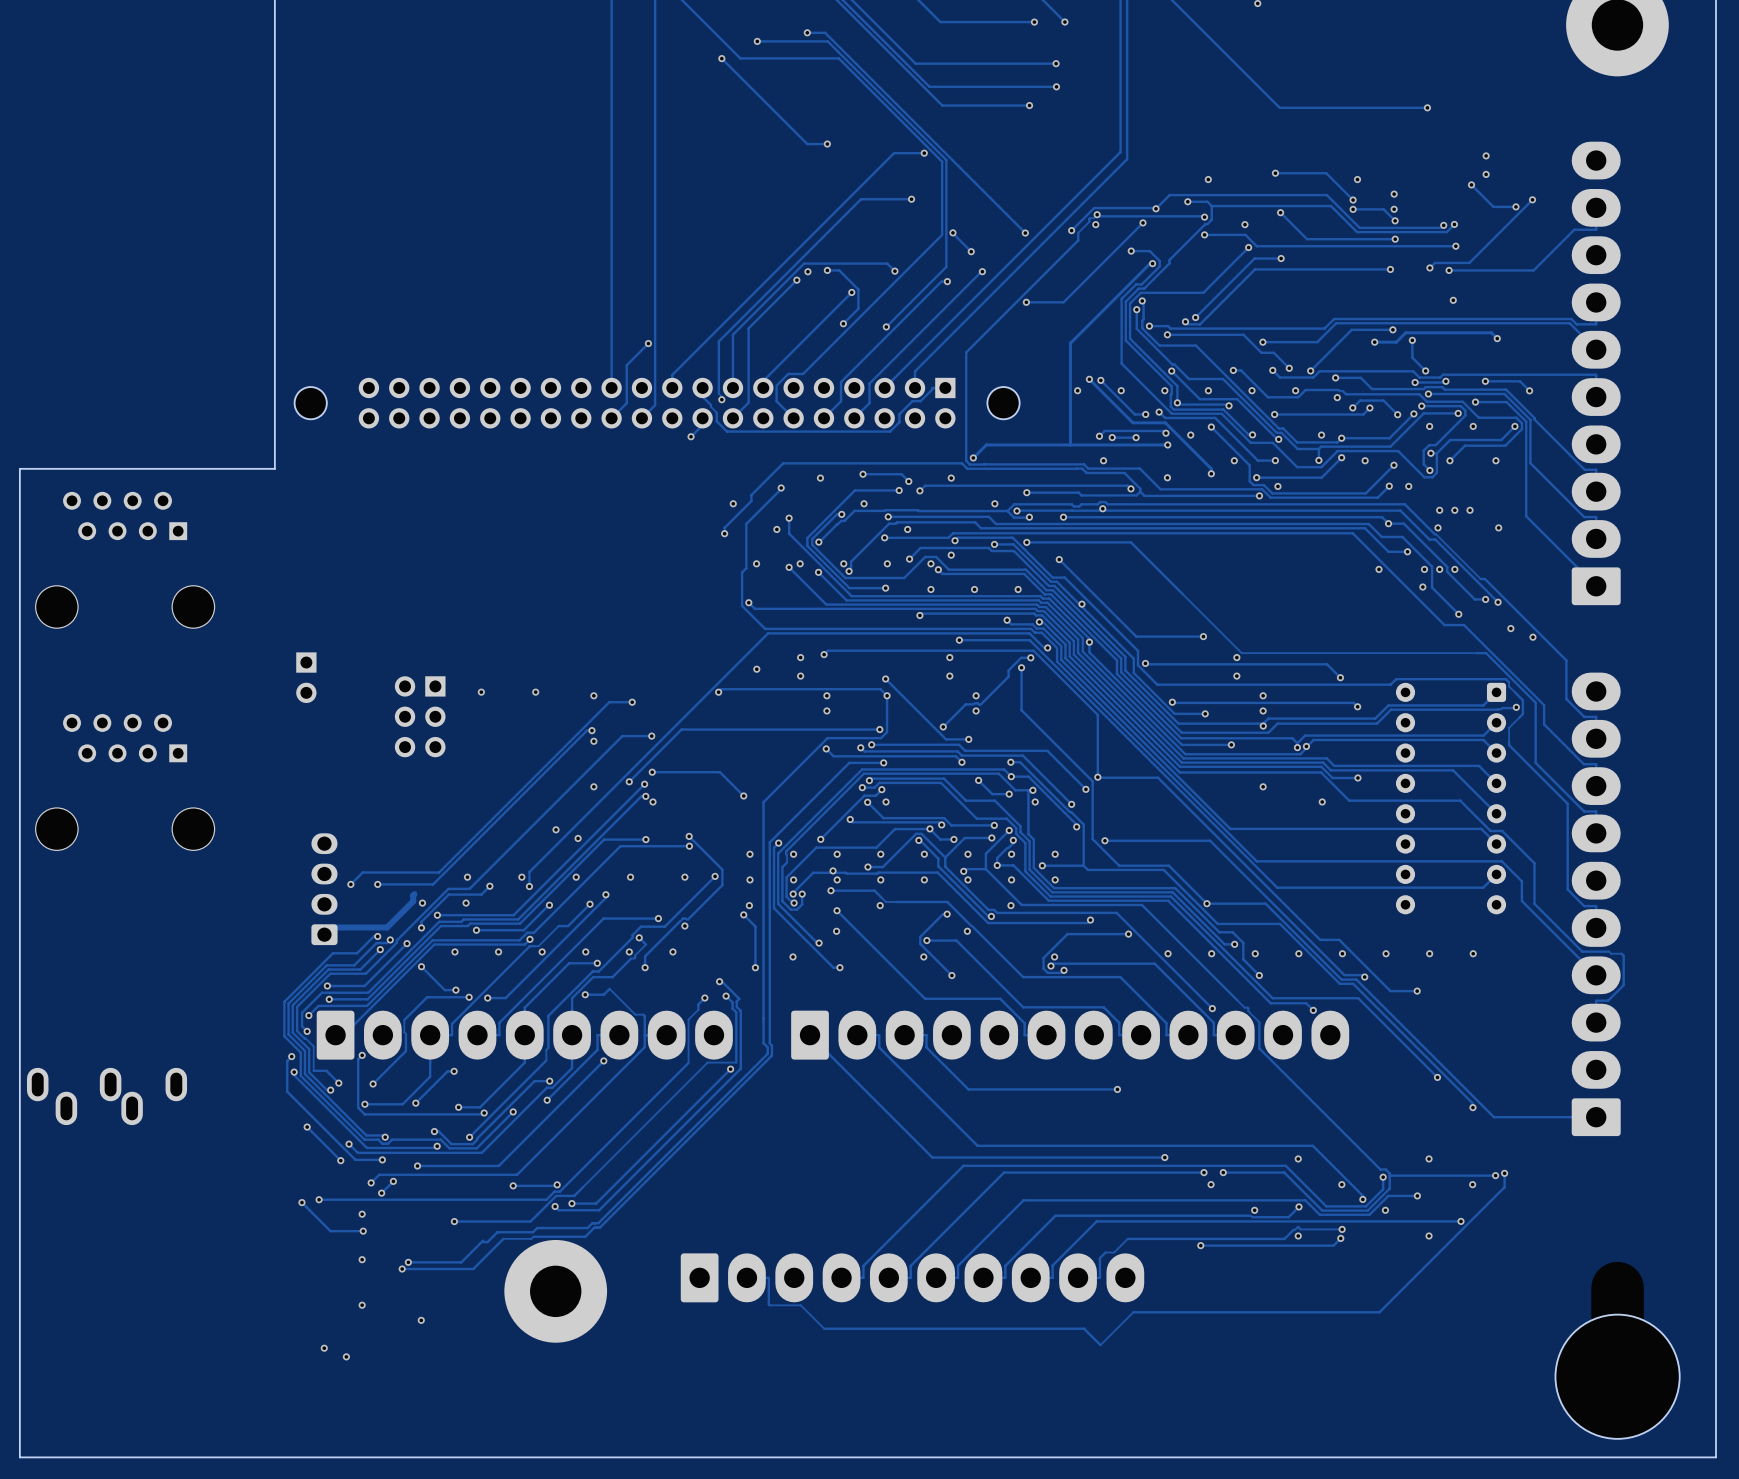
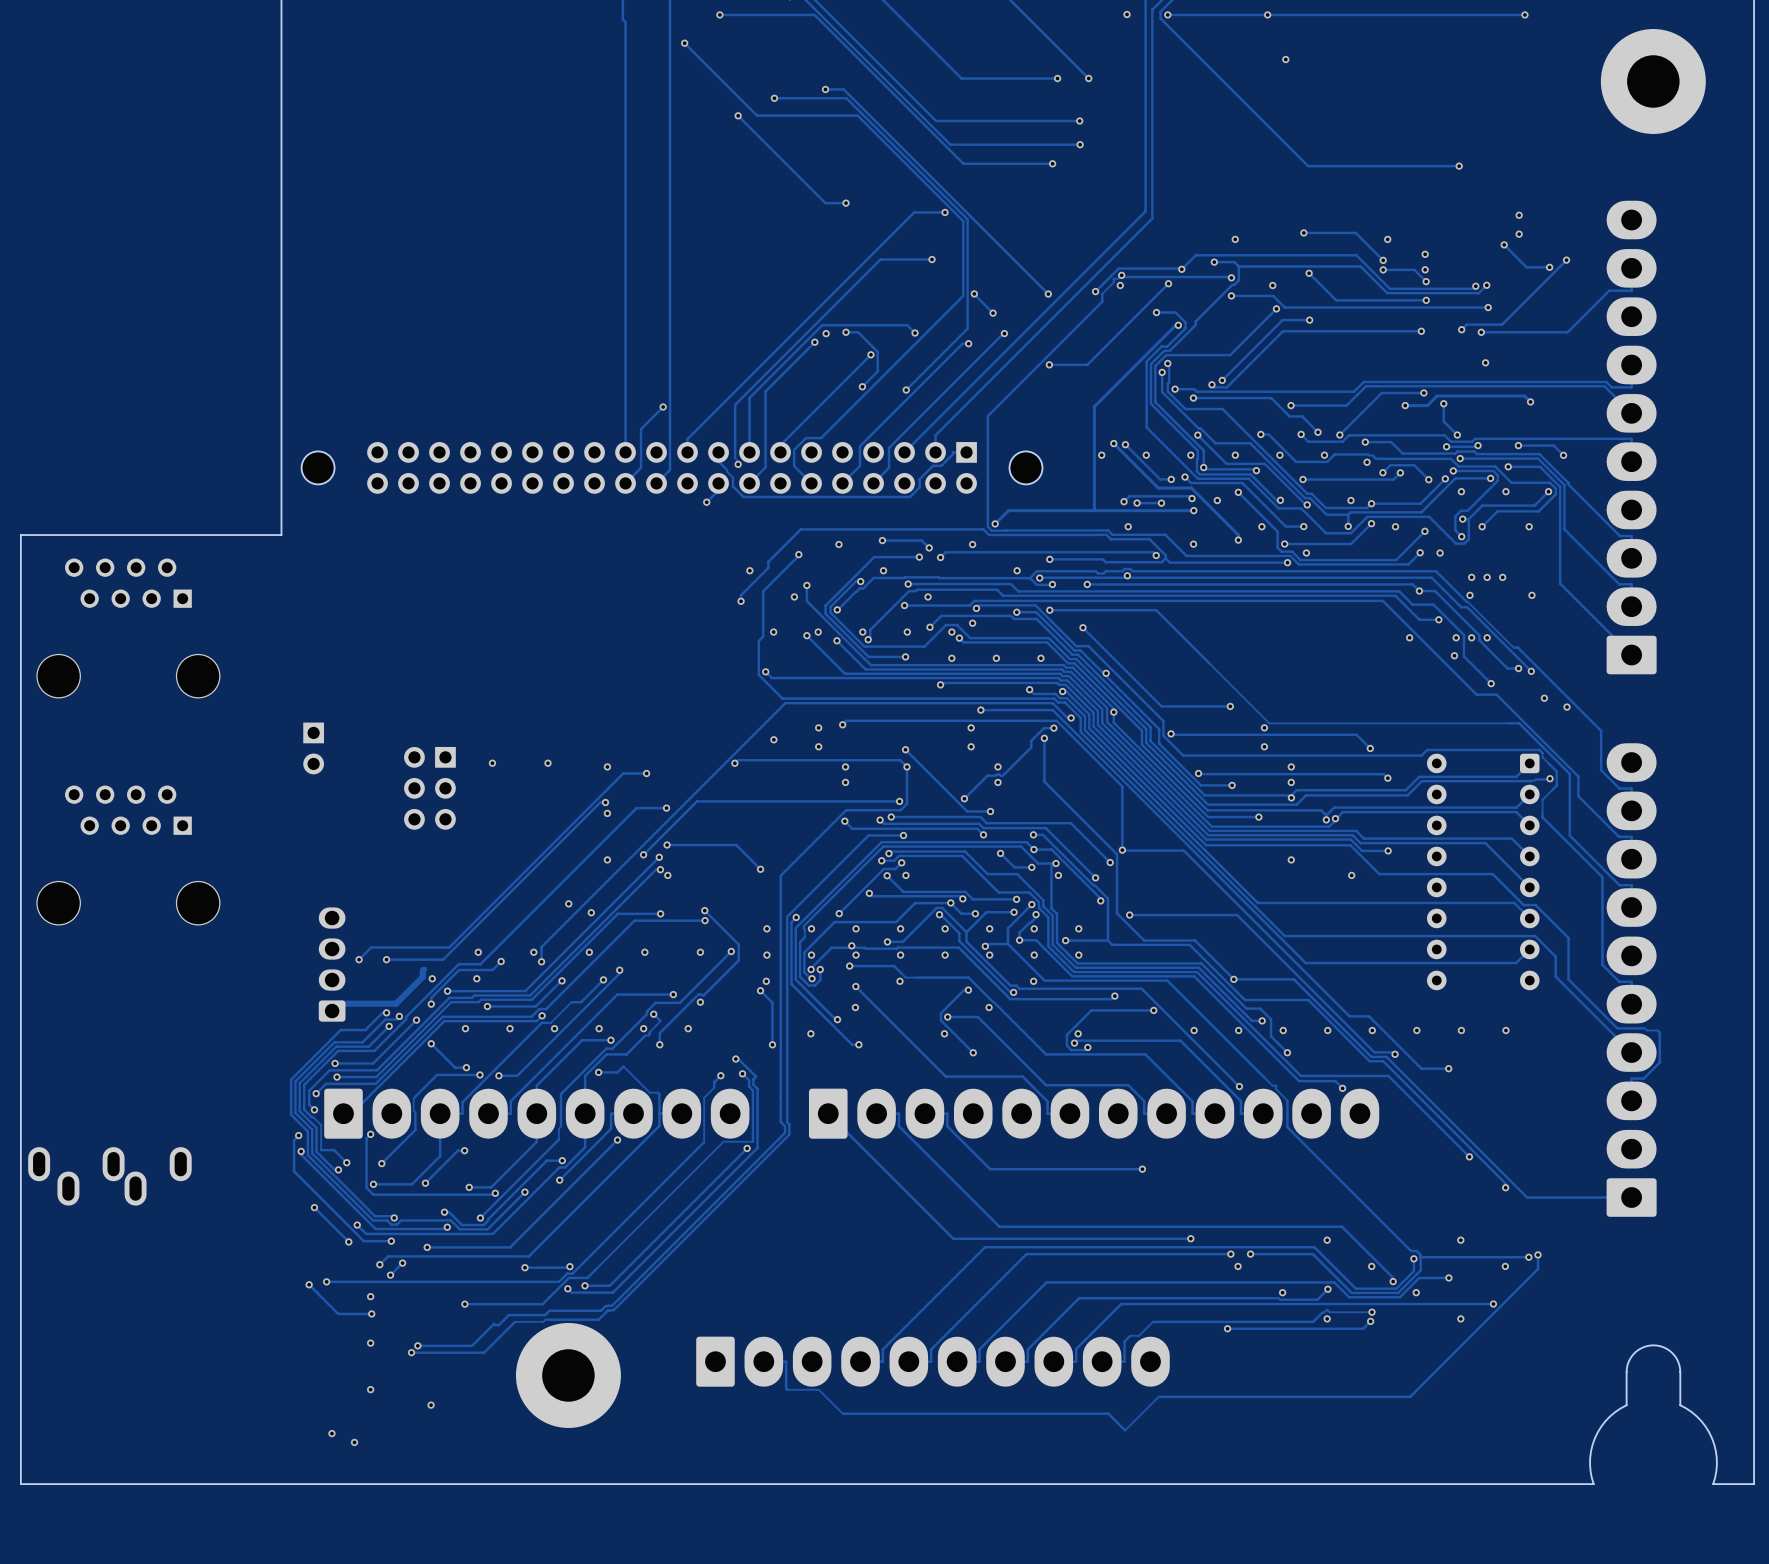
part: (1617, 1350) -> none
board edge: (1716, 1397) (1716, 1457) (19, 1457) (19, 1397) -> (1754, 1484) (1713, 1484) (1716, 1464) (1712, 1438) (1701, 1421) (1680, 1405) (1680, 1368) (1676, 1358) (1666, 1348) (1653, 1345) (1640, 1348) (1630, 1358) (1626, 1368) (1626, 1405) (1610, 1416) (1594, 1438) (1590, 1457) (1593, 1484) (20, 1484)

